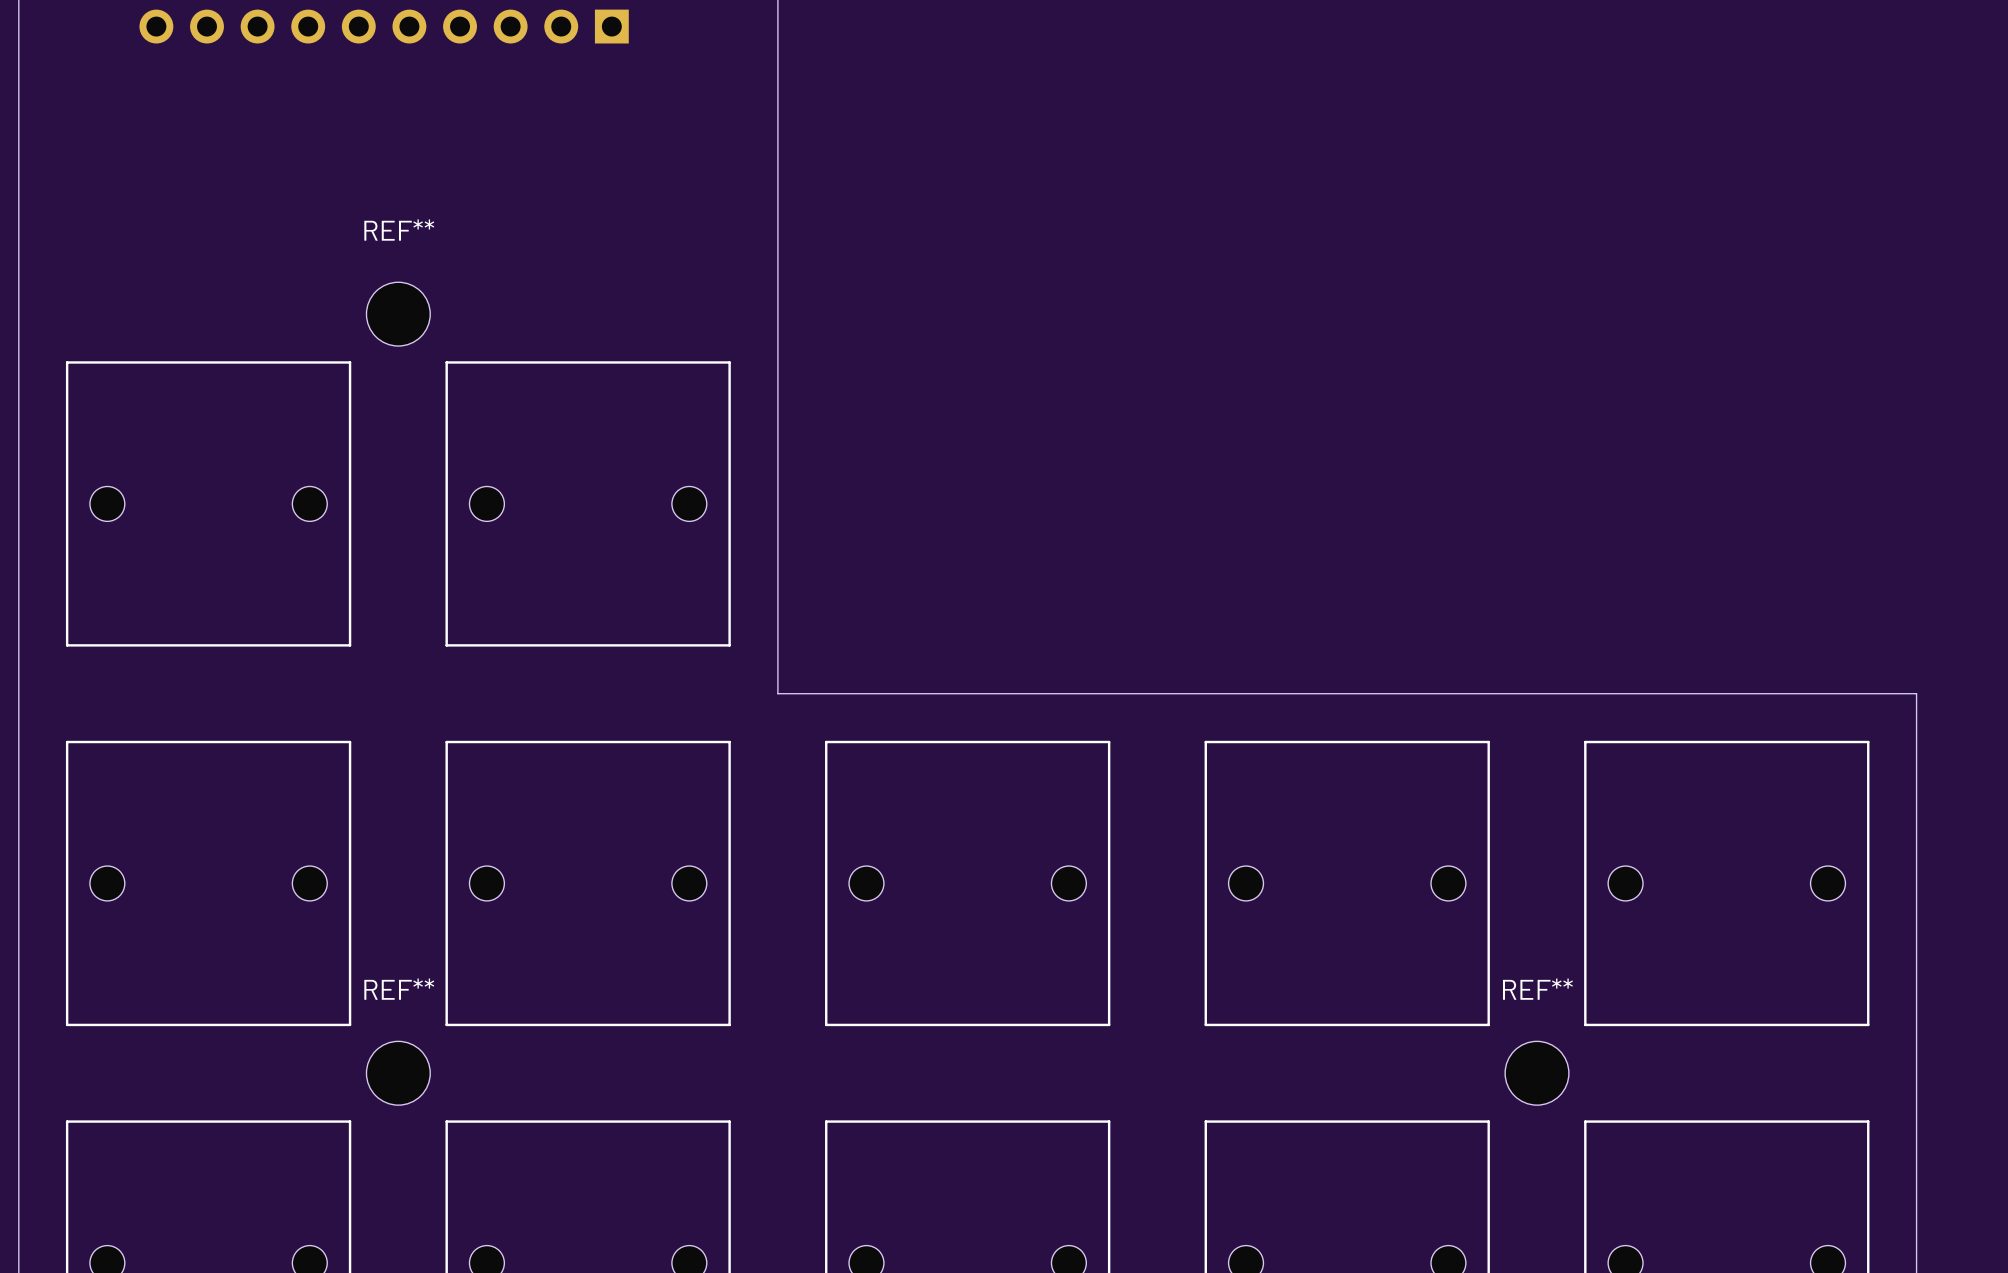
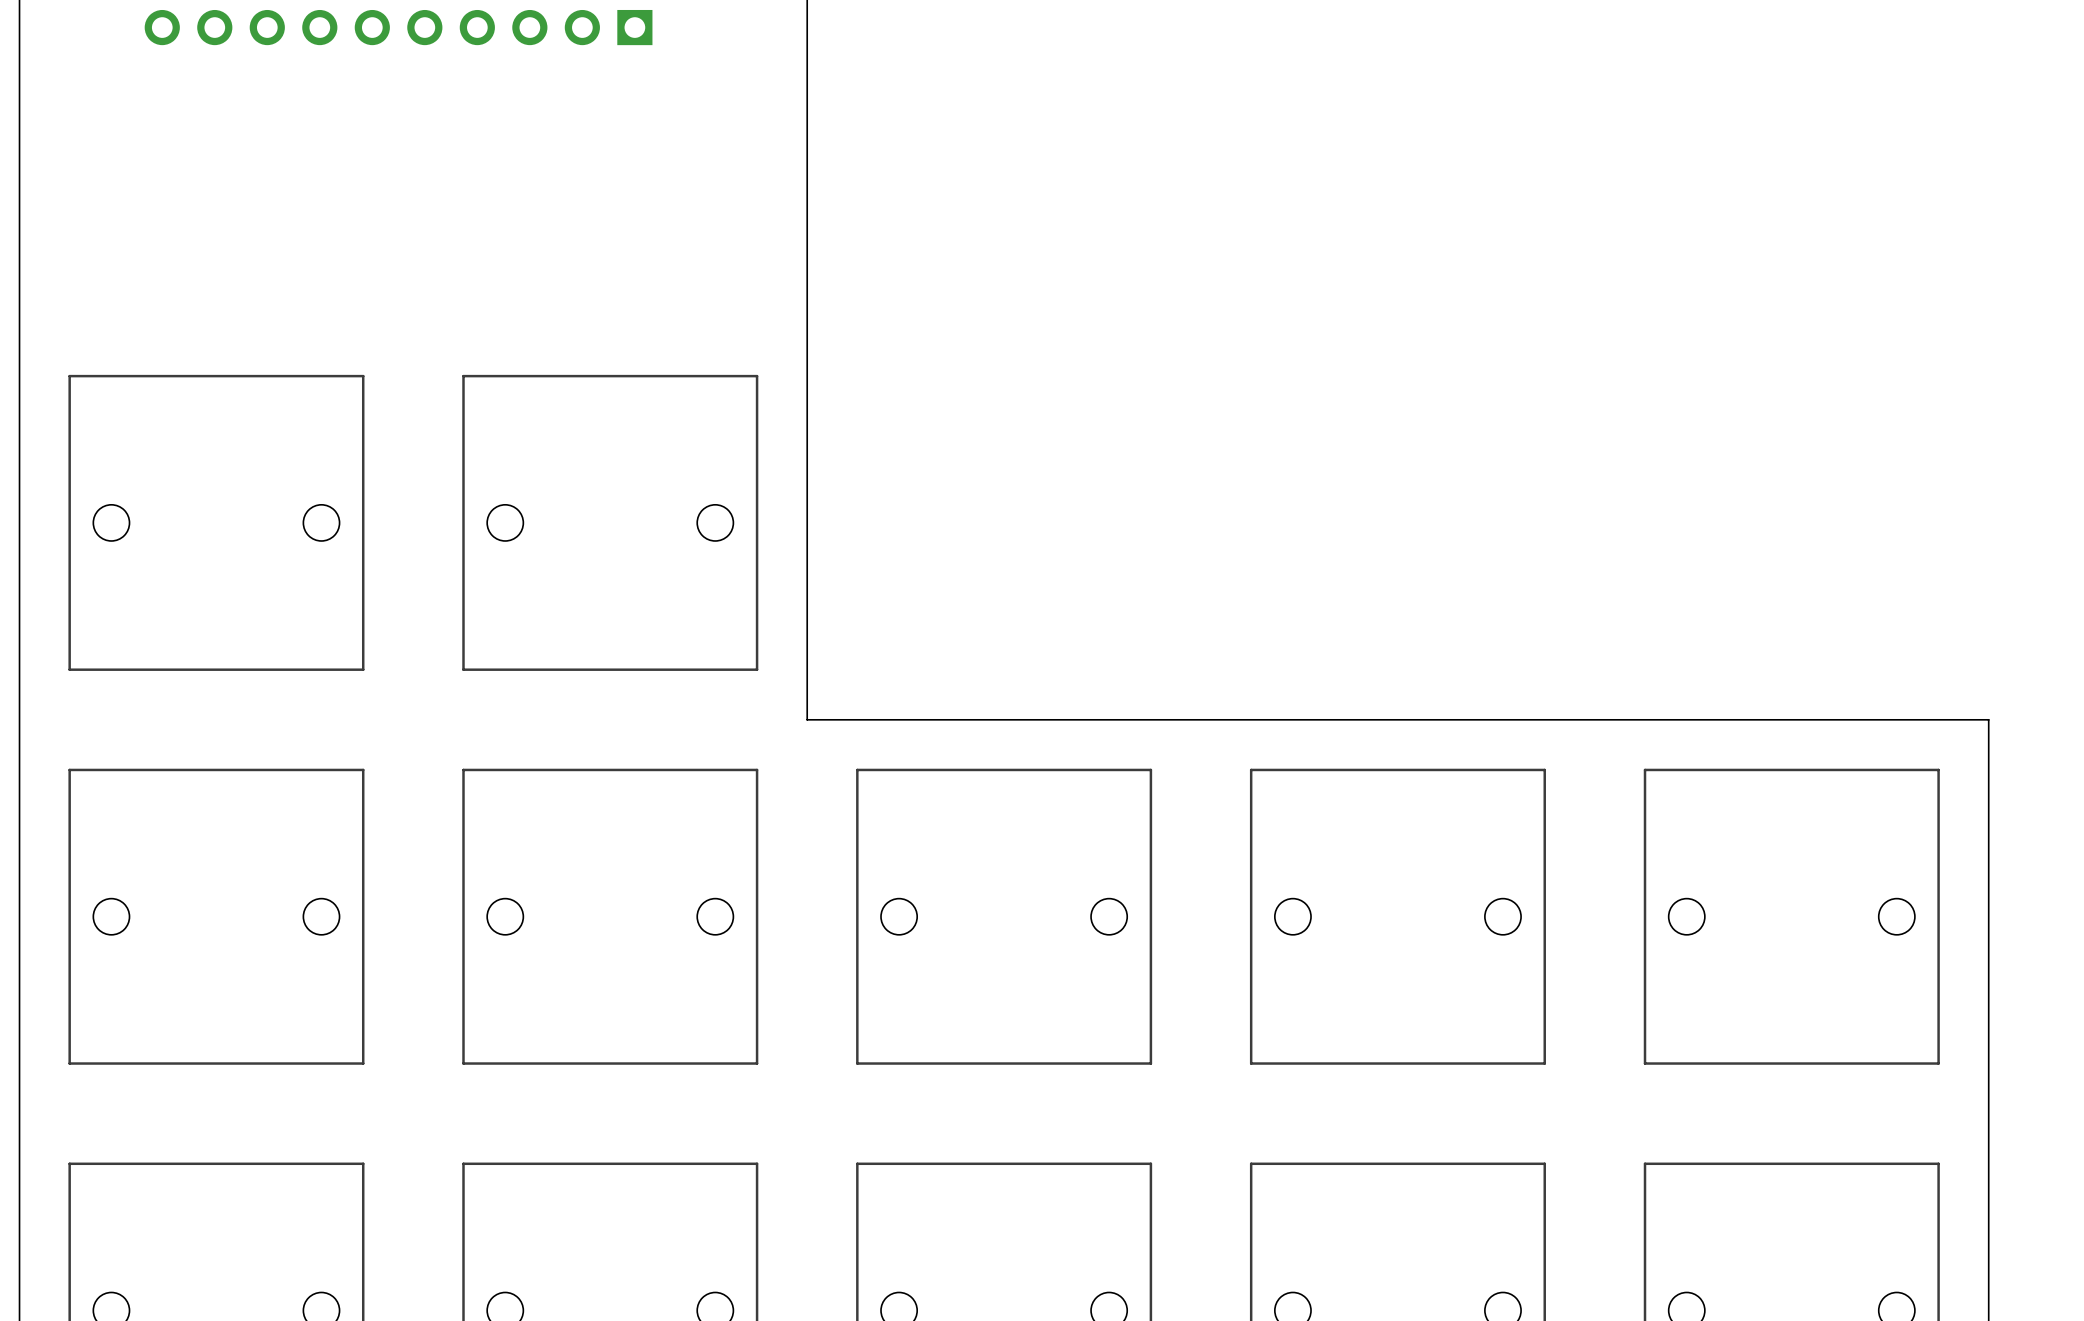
REF**: (398, 314) -> none
REF**: (398, 1073) -> none
REF**: (1537, 1073) -> none

